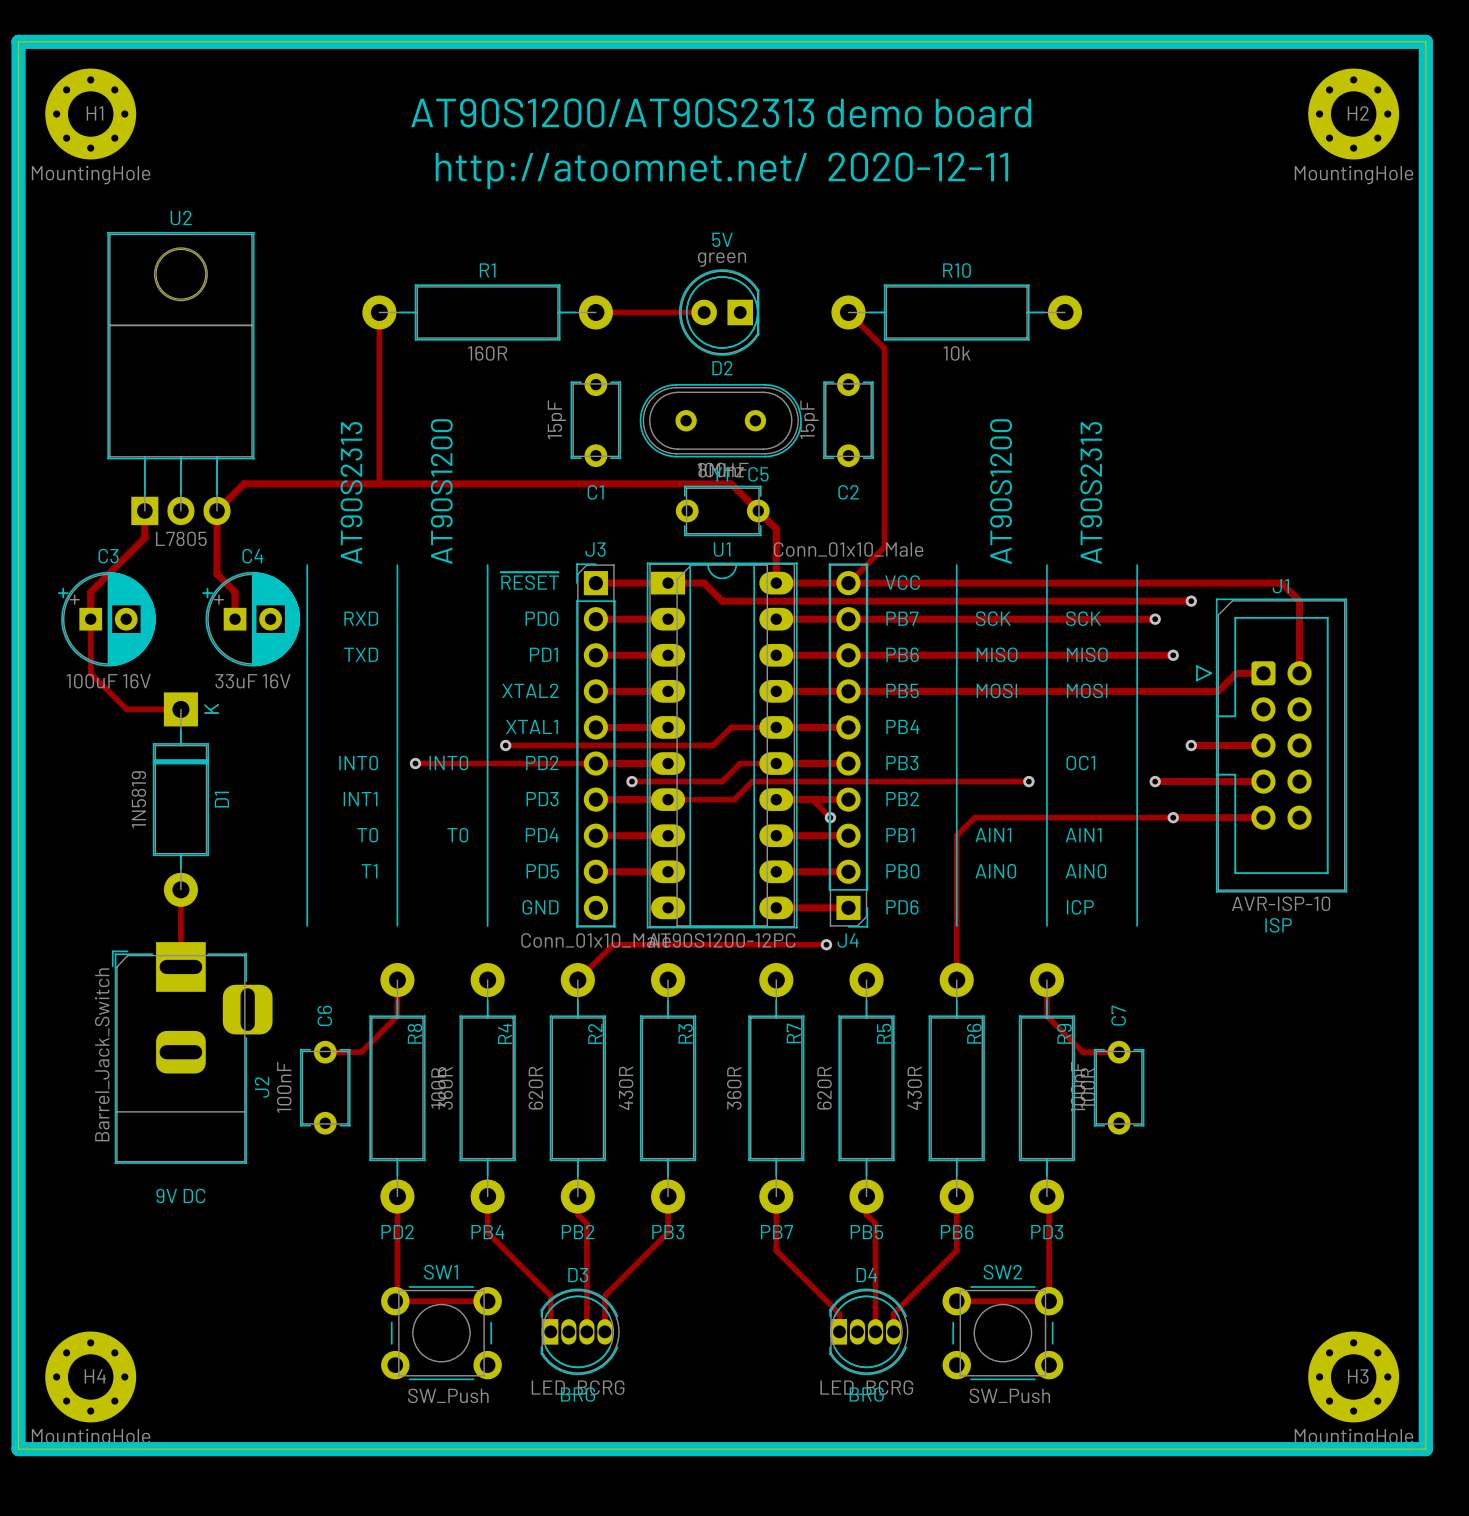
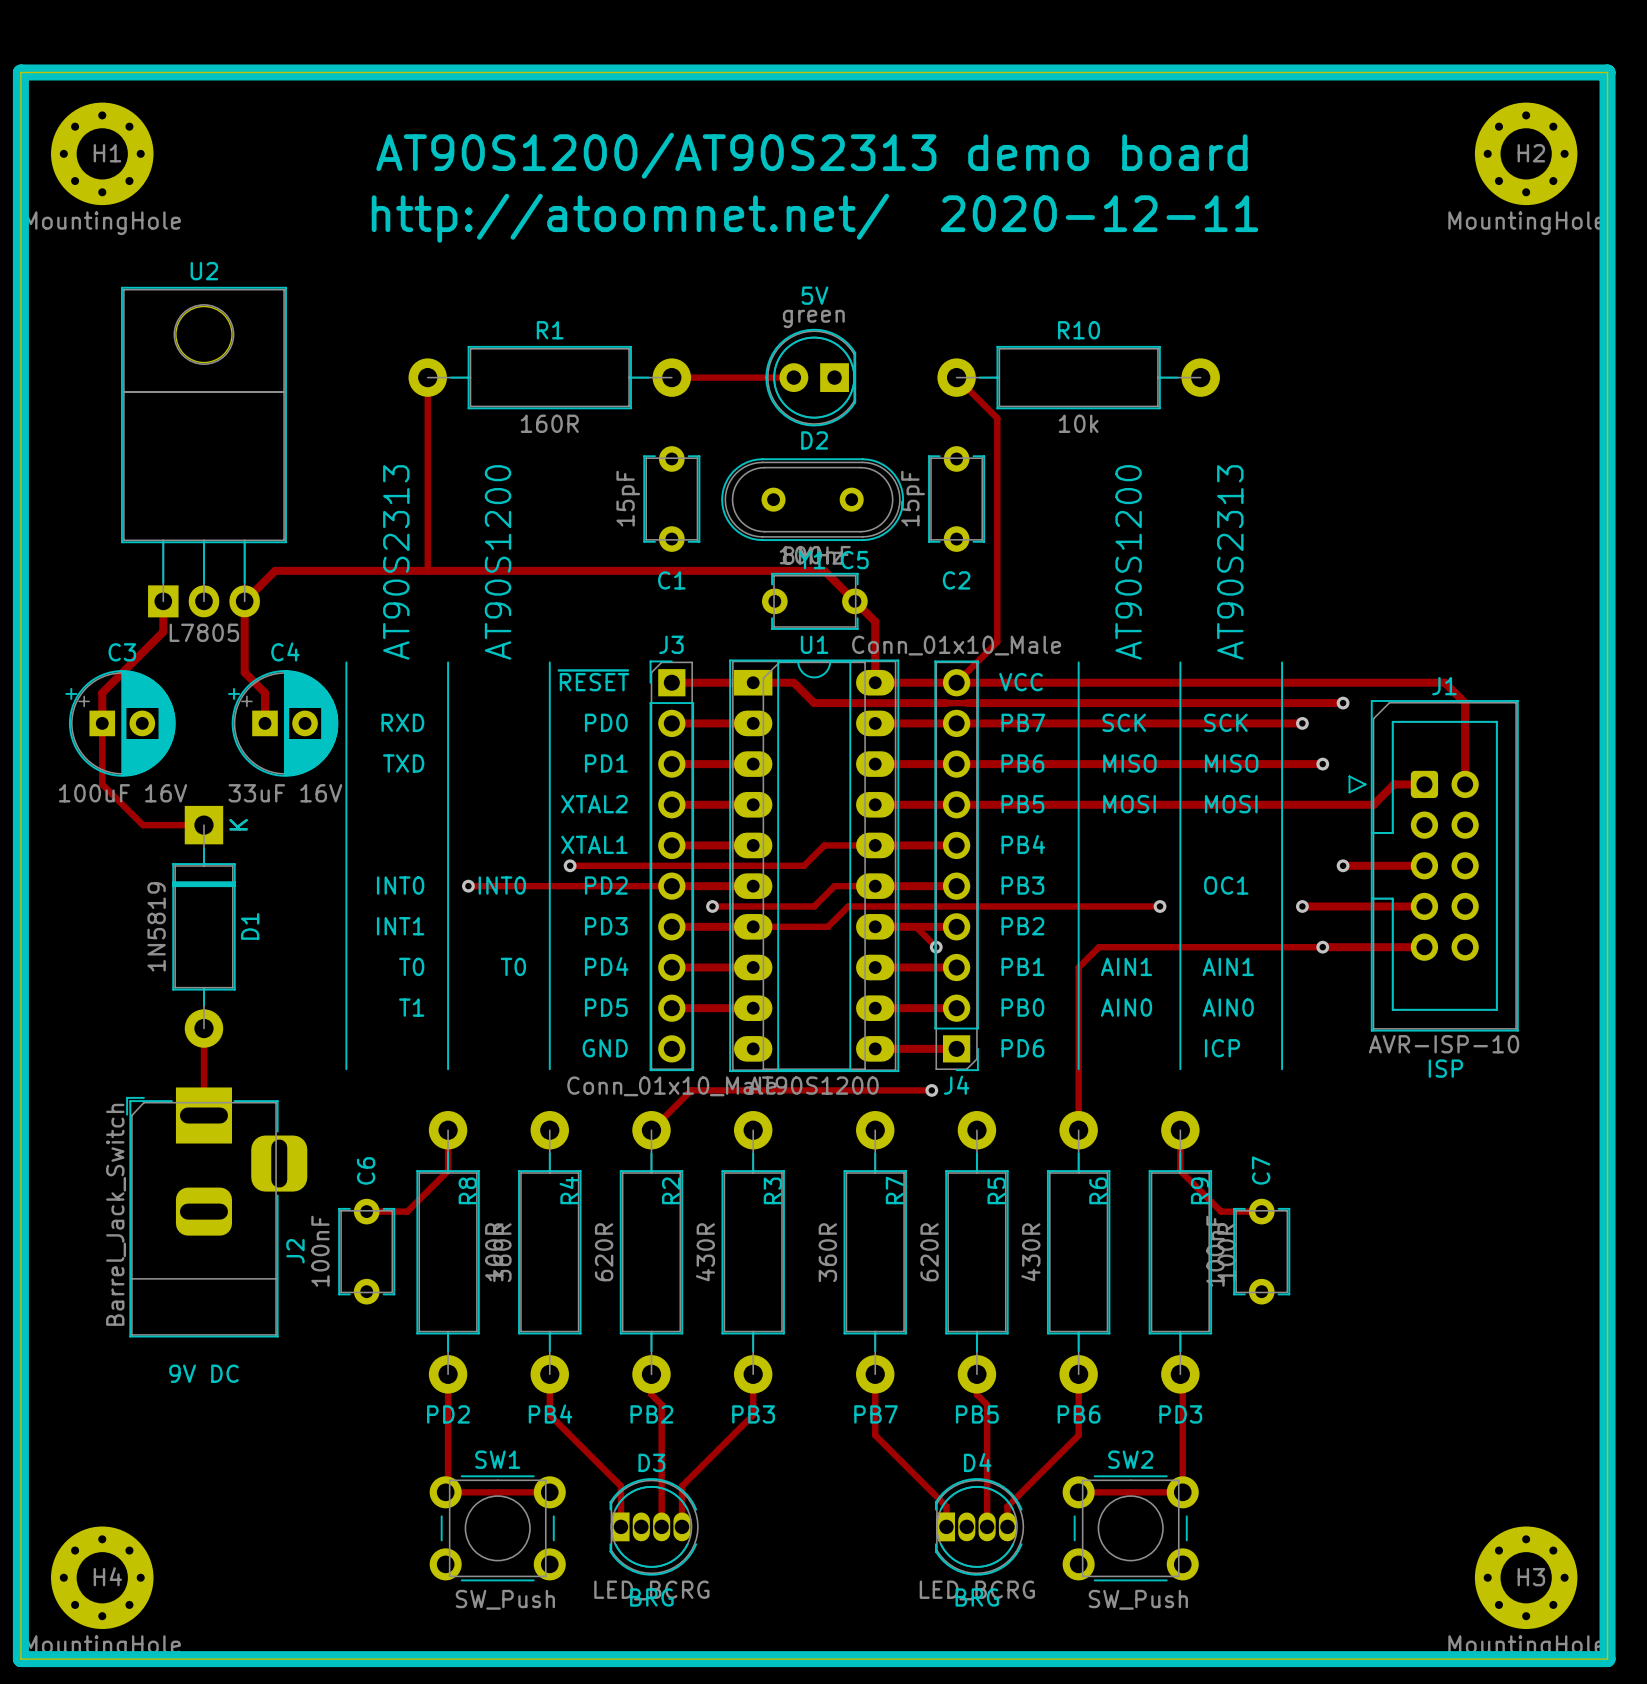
U1 value: AT90S1200-12PC (721, 940) -> AT90S1200 (813, 1085)

